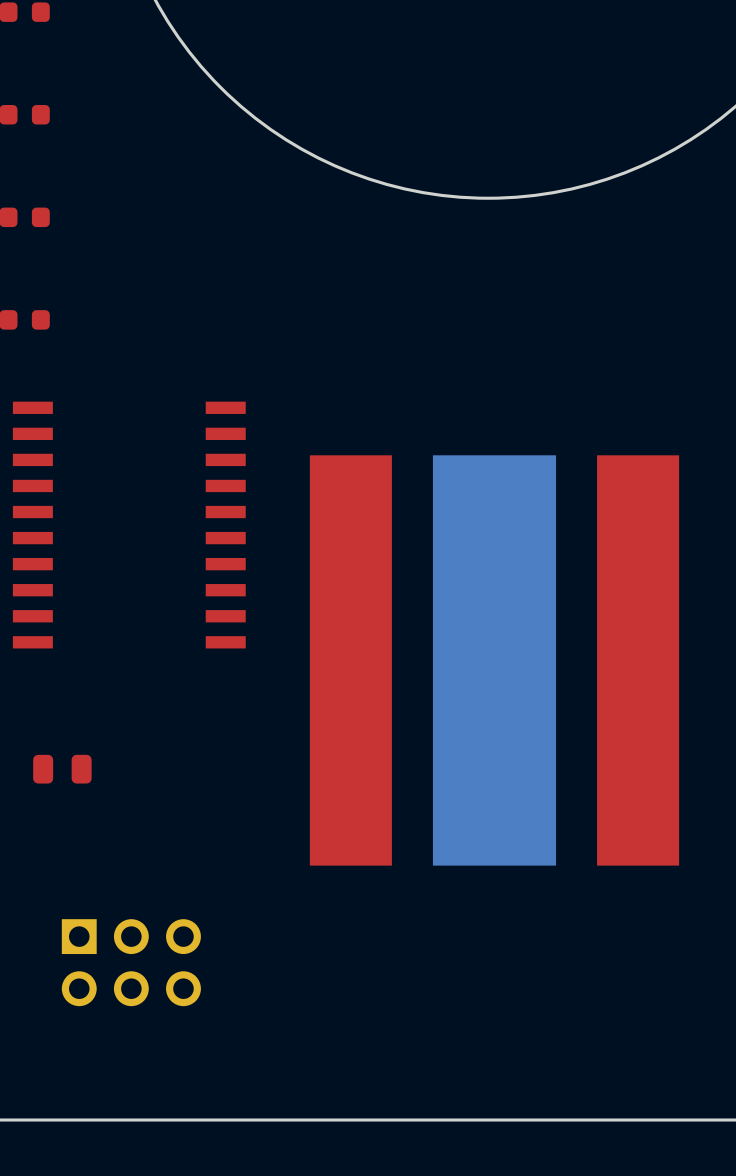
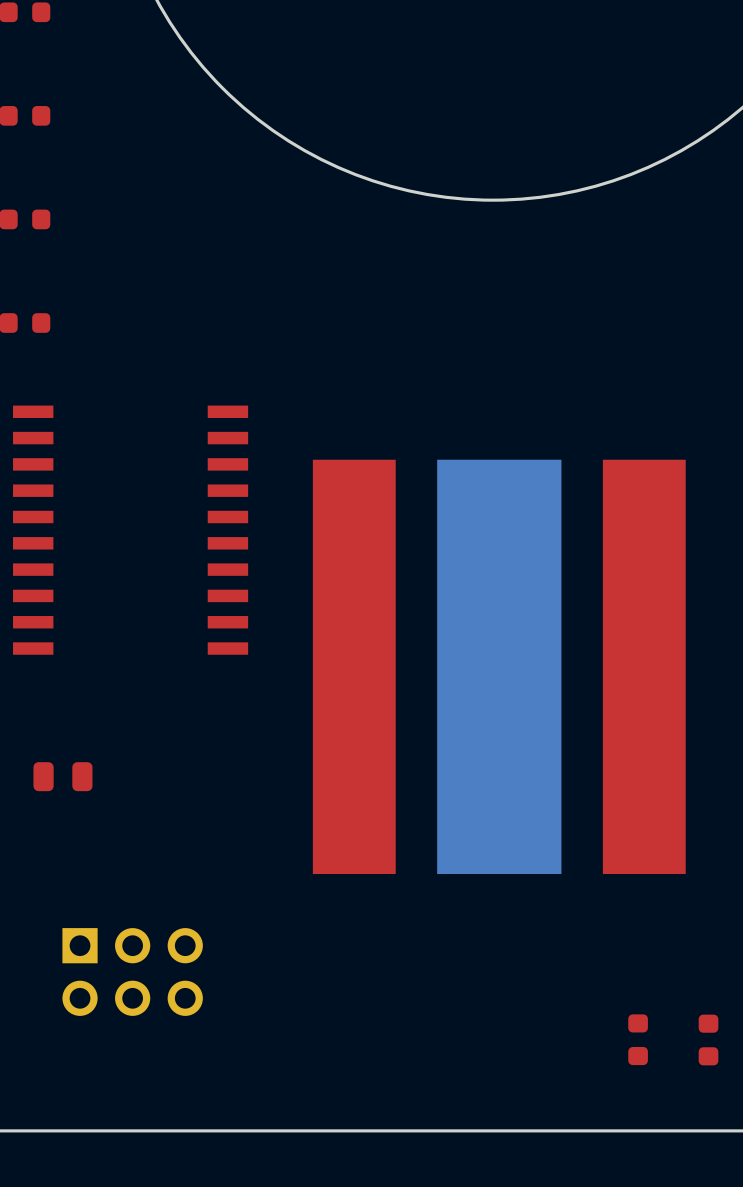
part: none -> (638, 1039)
part: none -> (708, 1039)

